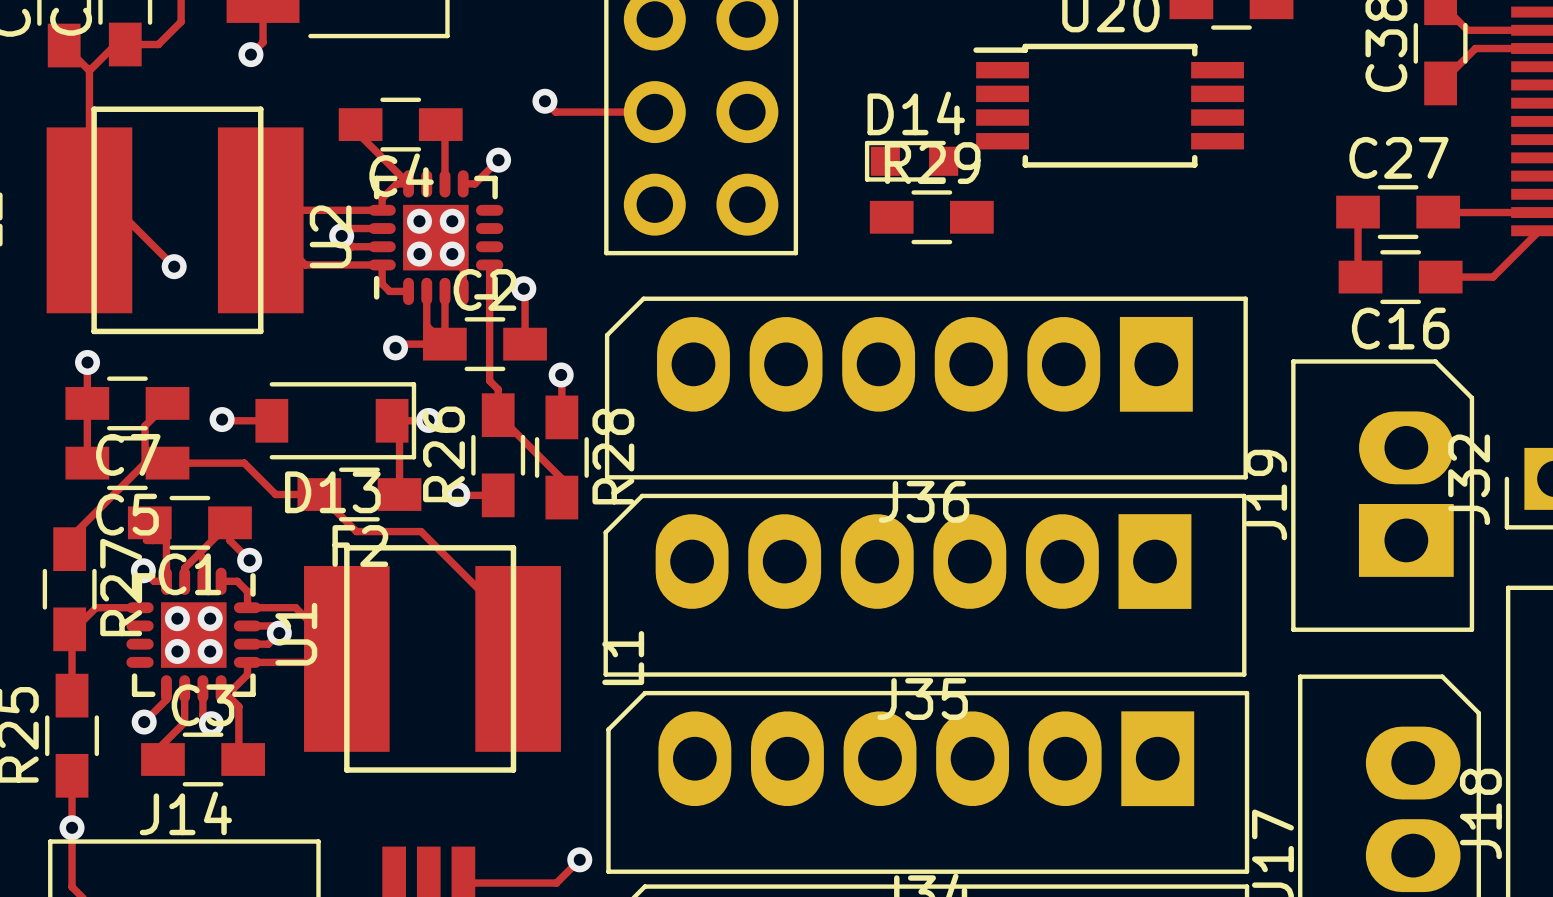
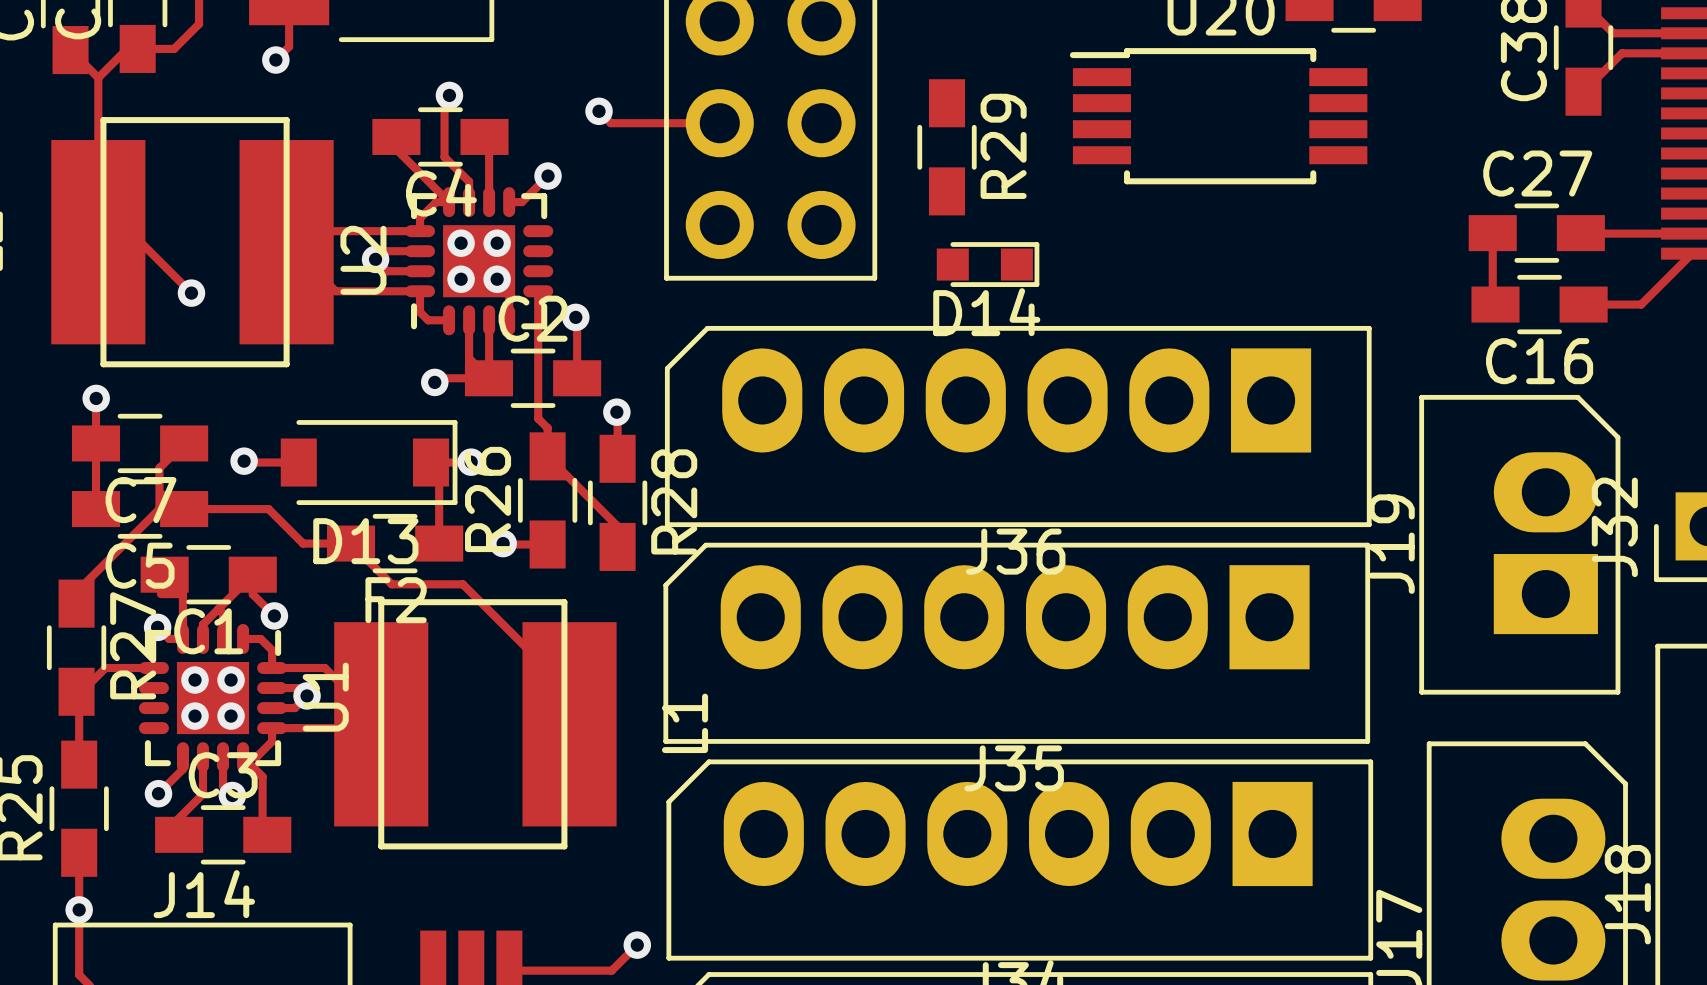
track: none -> (449, 95) (444, 100) (444, 157) (469, 181) (469, 202)
via: none -> (449, 95)
D14 rotation: 0° (911, 161) -> 180° (988, 264)
D14 position: (911, 161) -> (988, 264)
R29 rotation: 0° (931, 217) -> 90° clockwise (947, 147)
R29 position: (931, 217) -> (947, 147)

